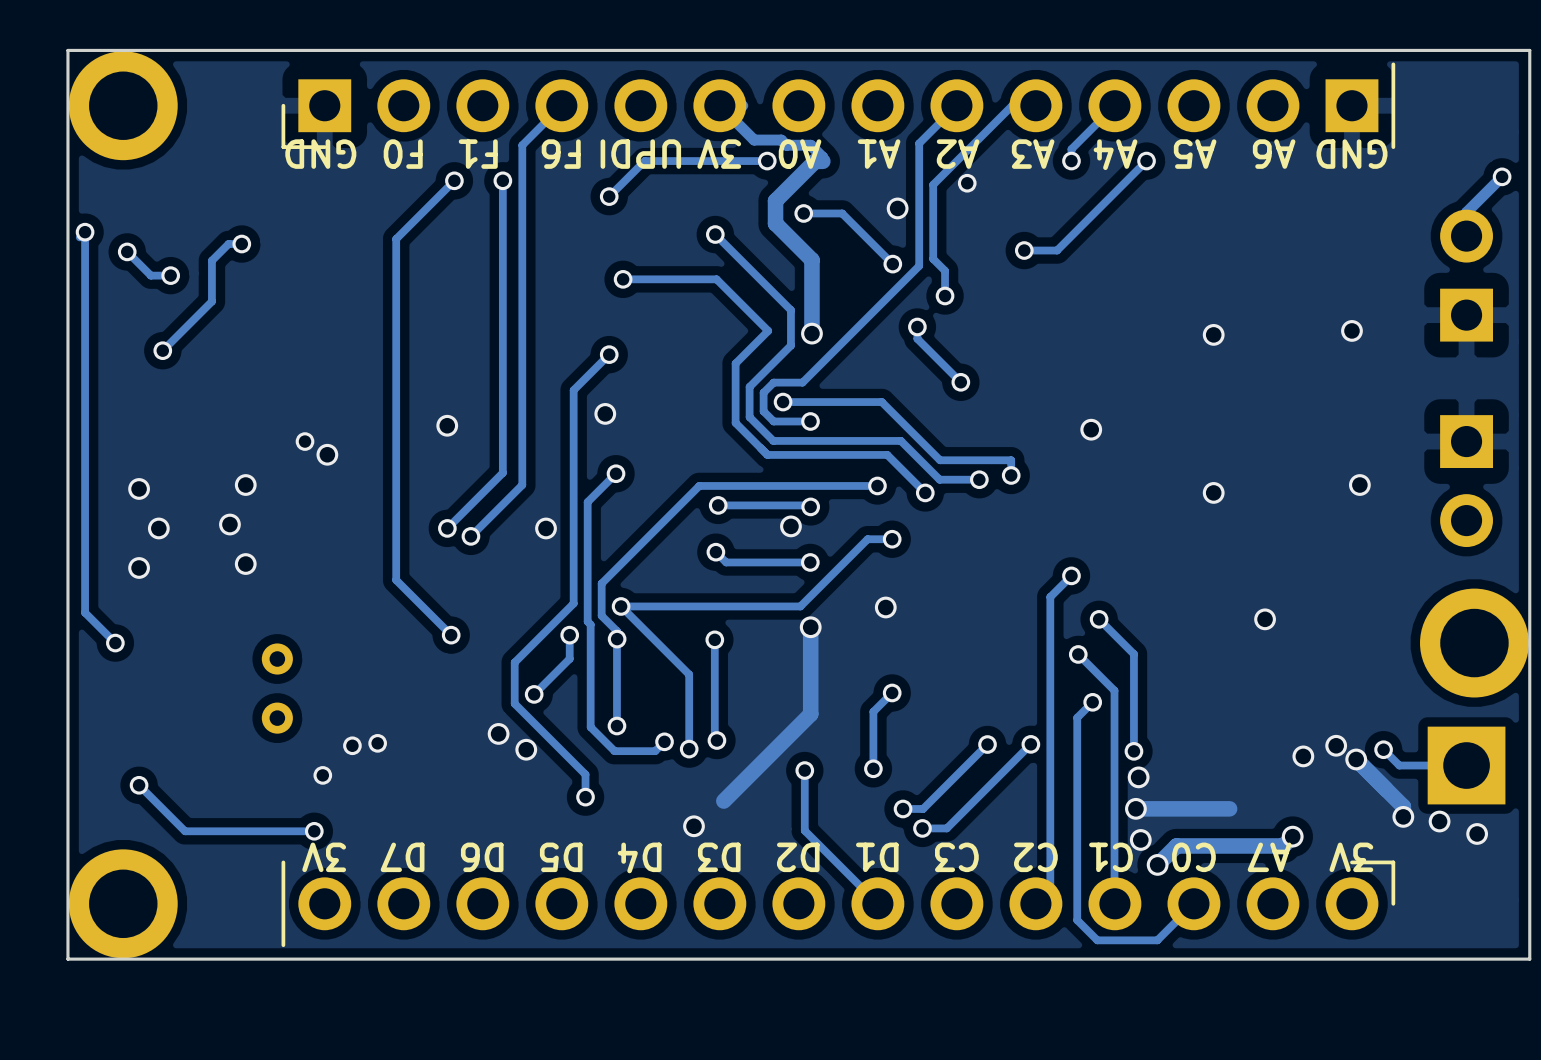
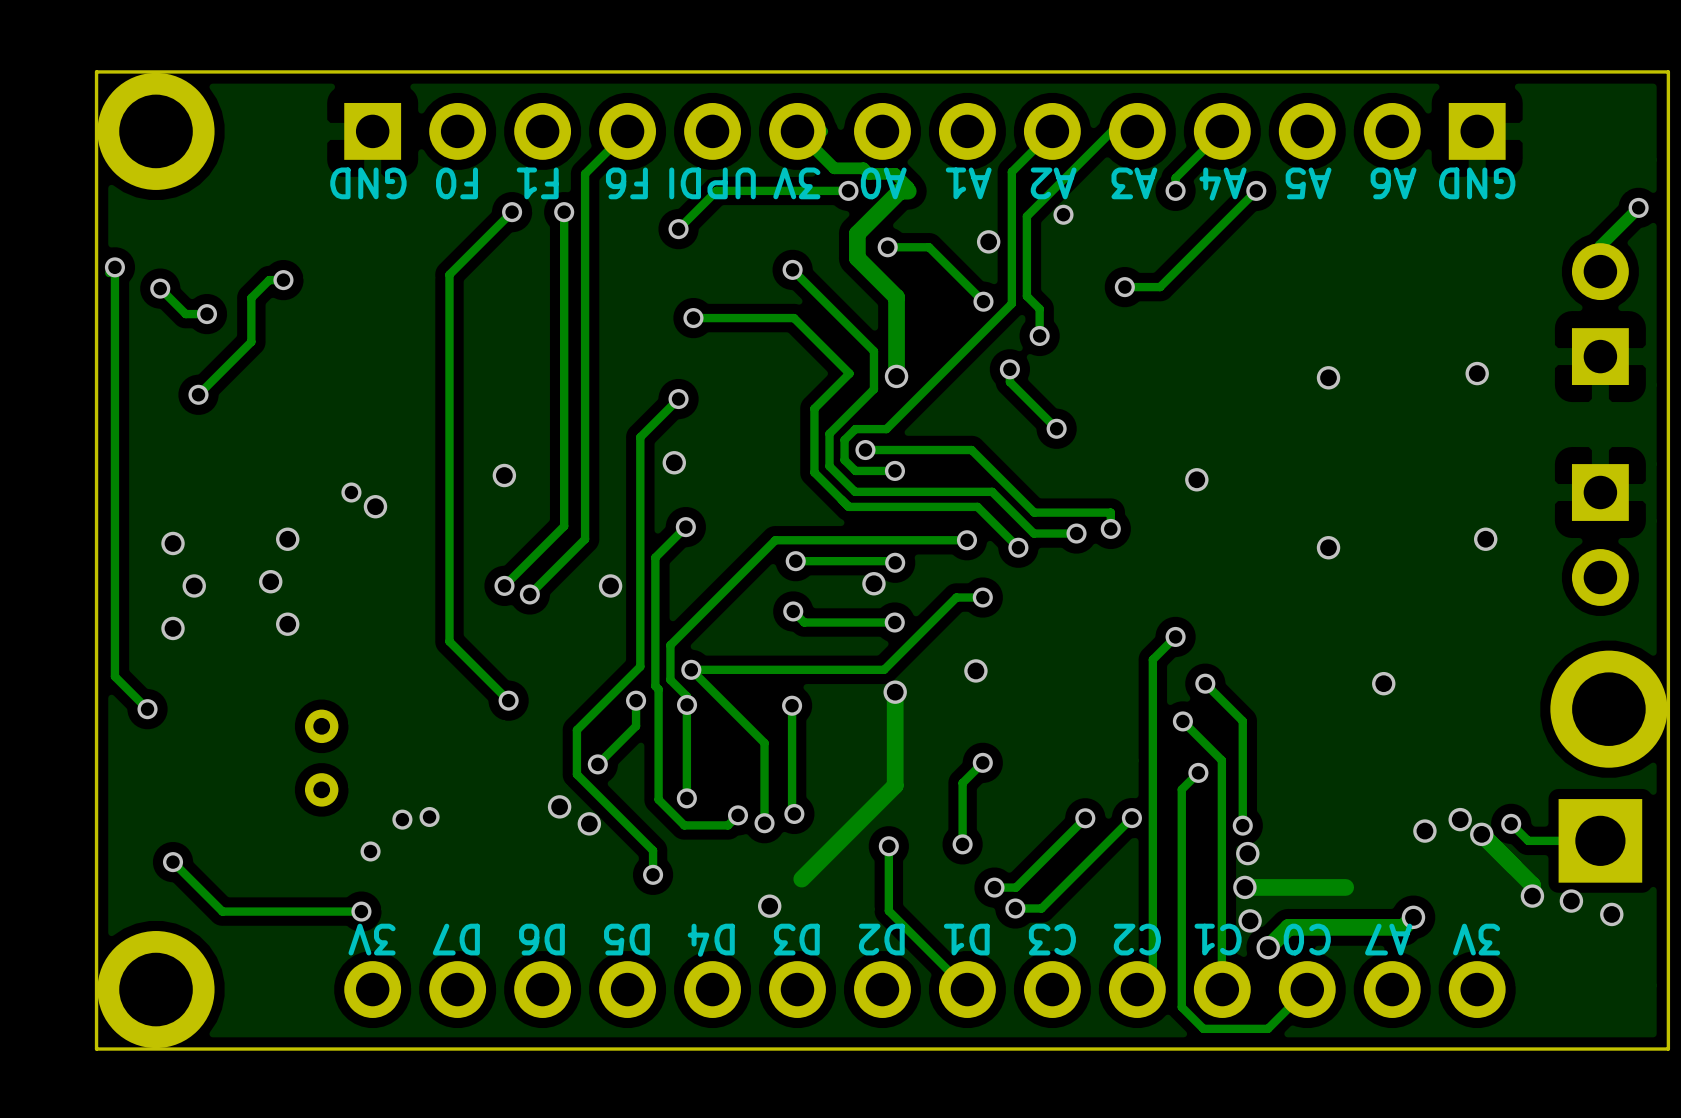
part footprint: [281, 62, 1396, 149] -> [344, 102, 1506, 160]
part footprint: [281, 860, 1396, 948] -> [344, 961, 1506, 1018]

